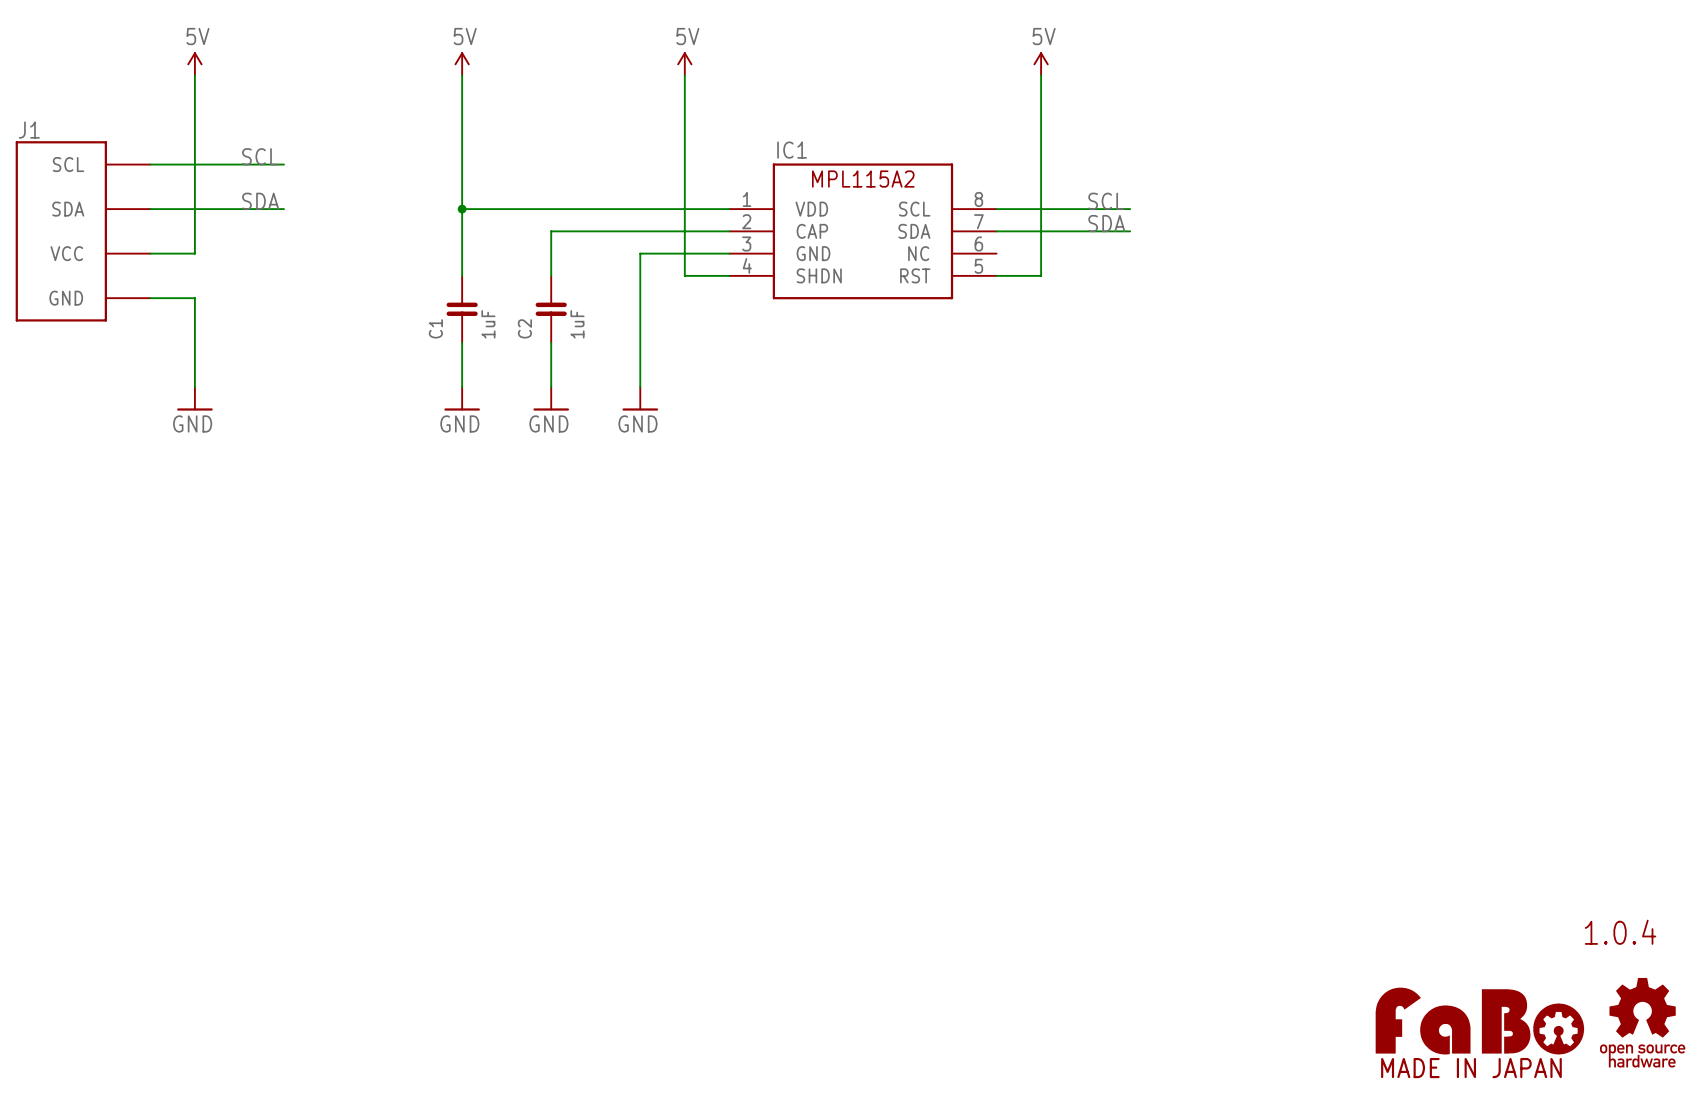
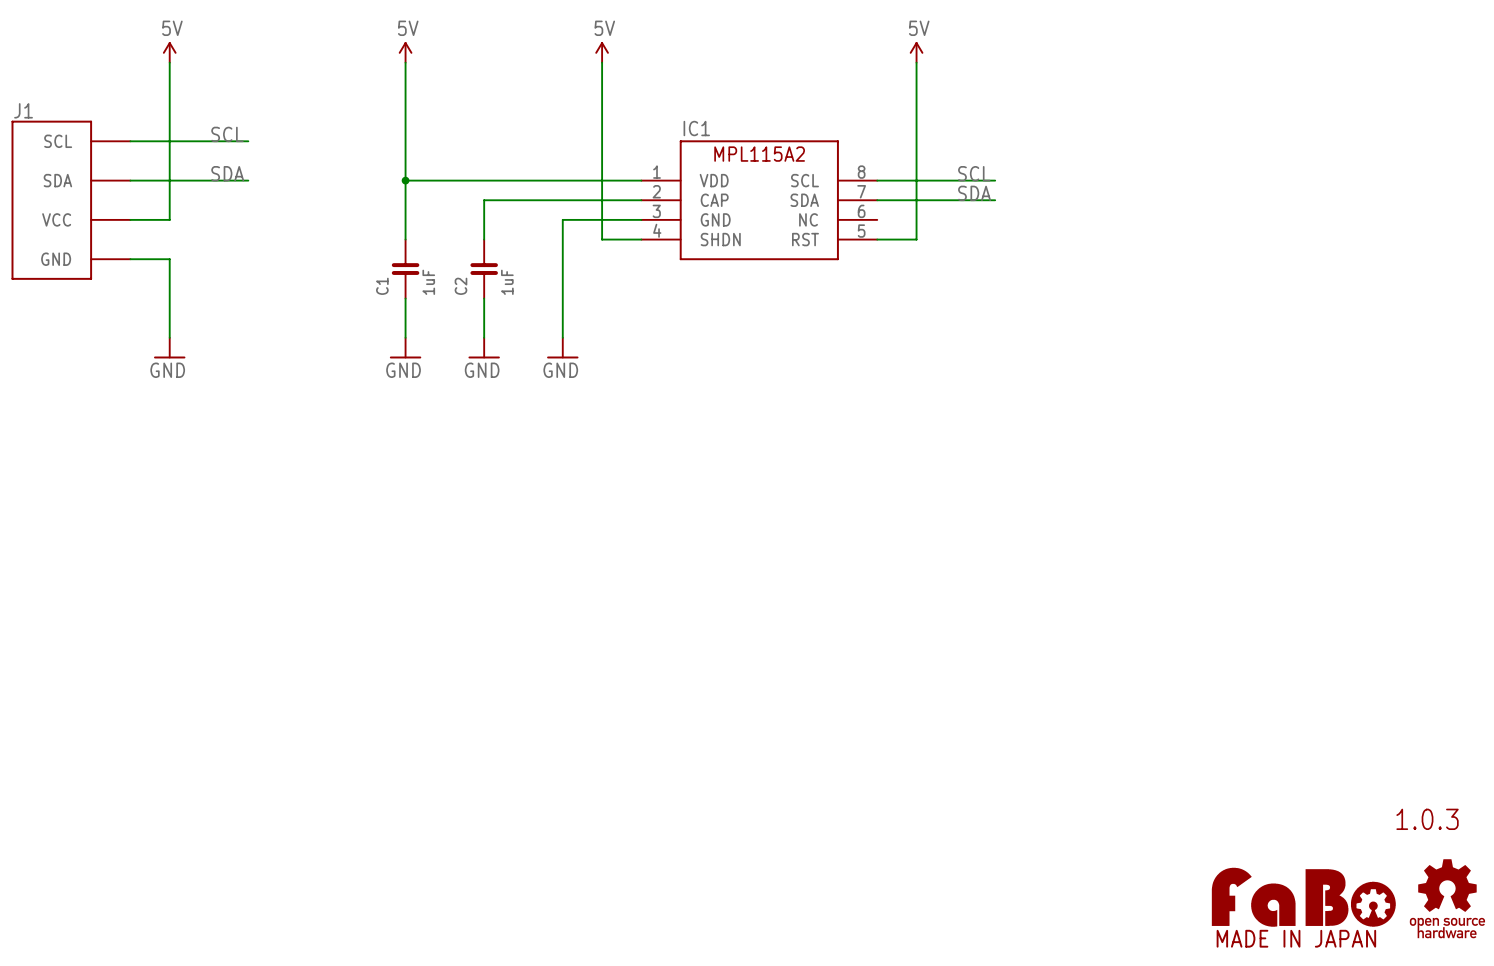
text: 1.0.4 (1620, 932) -> 1.0.3 (1427, 819)

